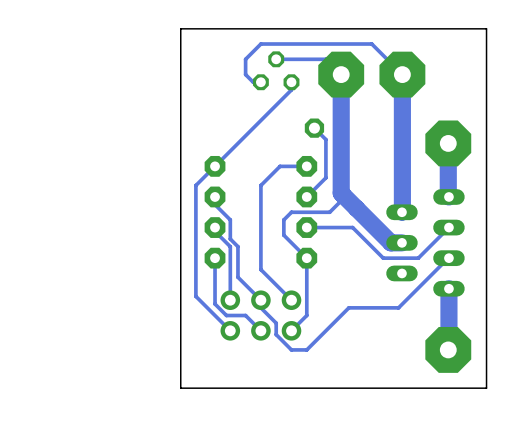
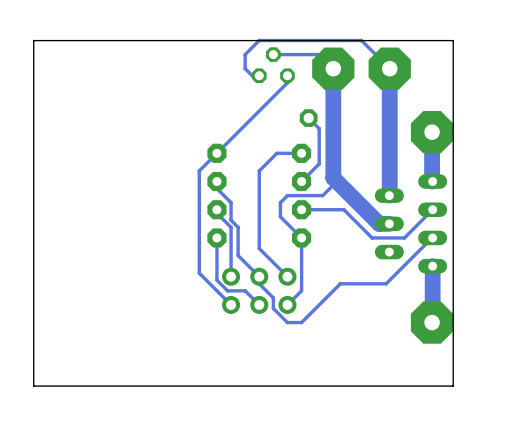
board edge: (486, 28) (180, 28) (180, 388) (486, 388) (486, 28) -> (453, 40) (453, 386) (33, 386) (33, 40) (453, 40)

